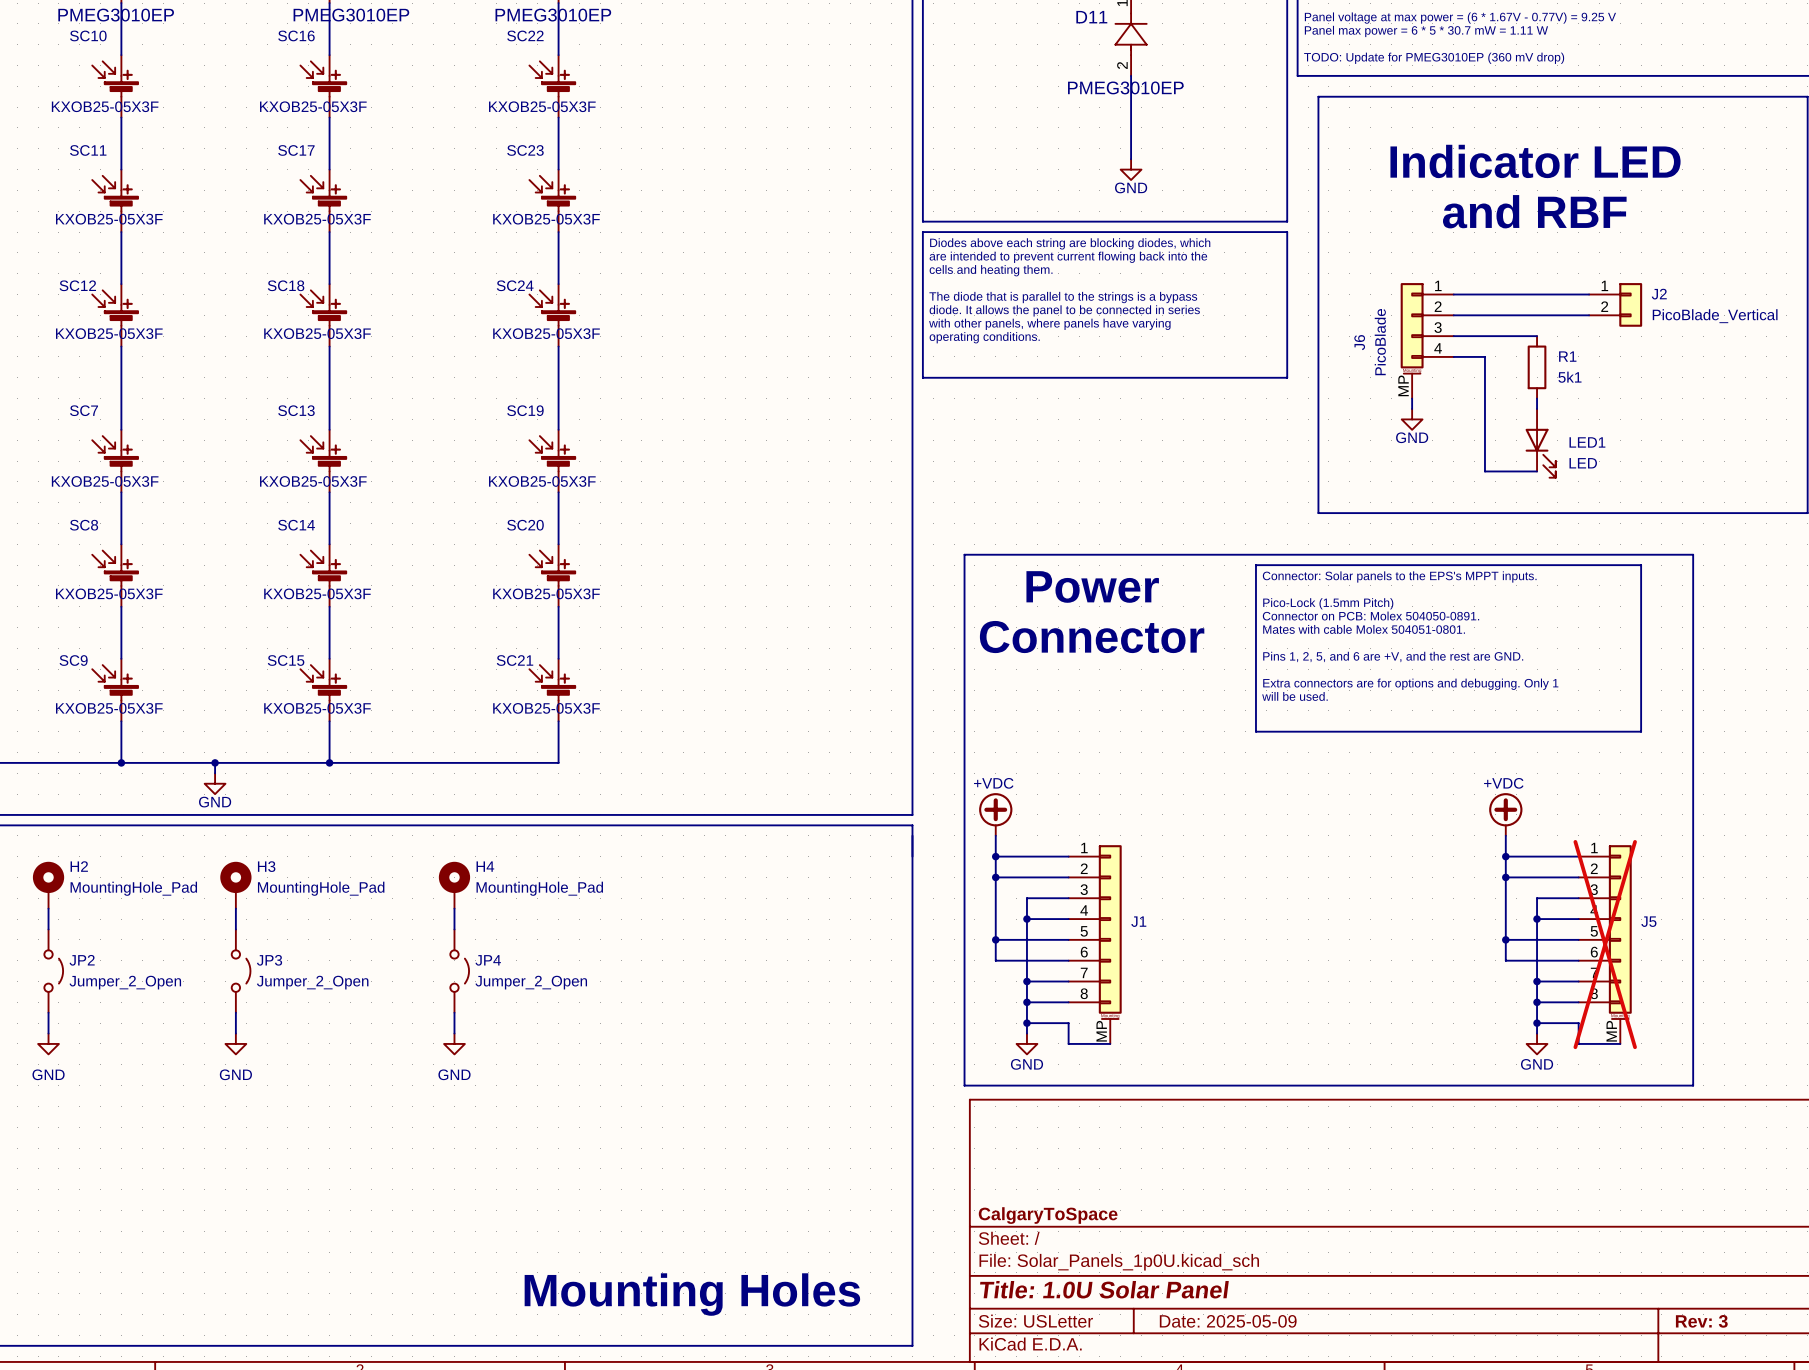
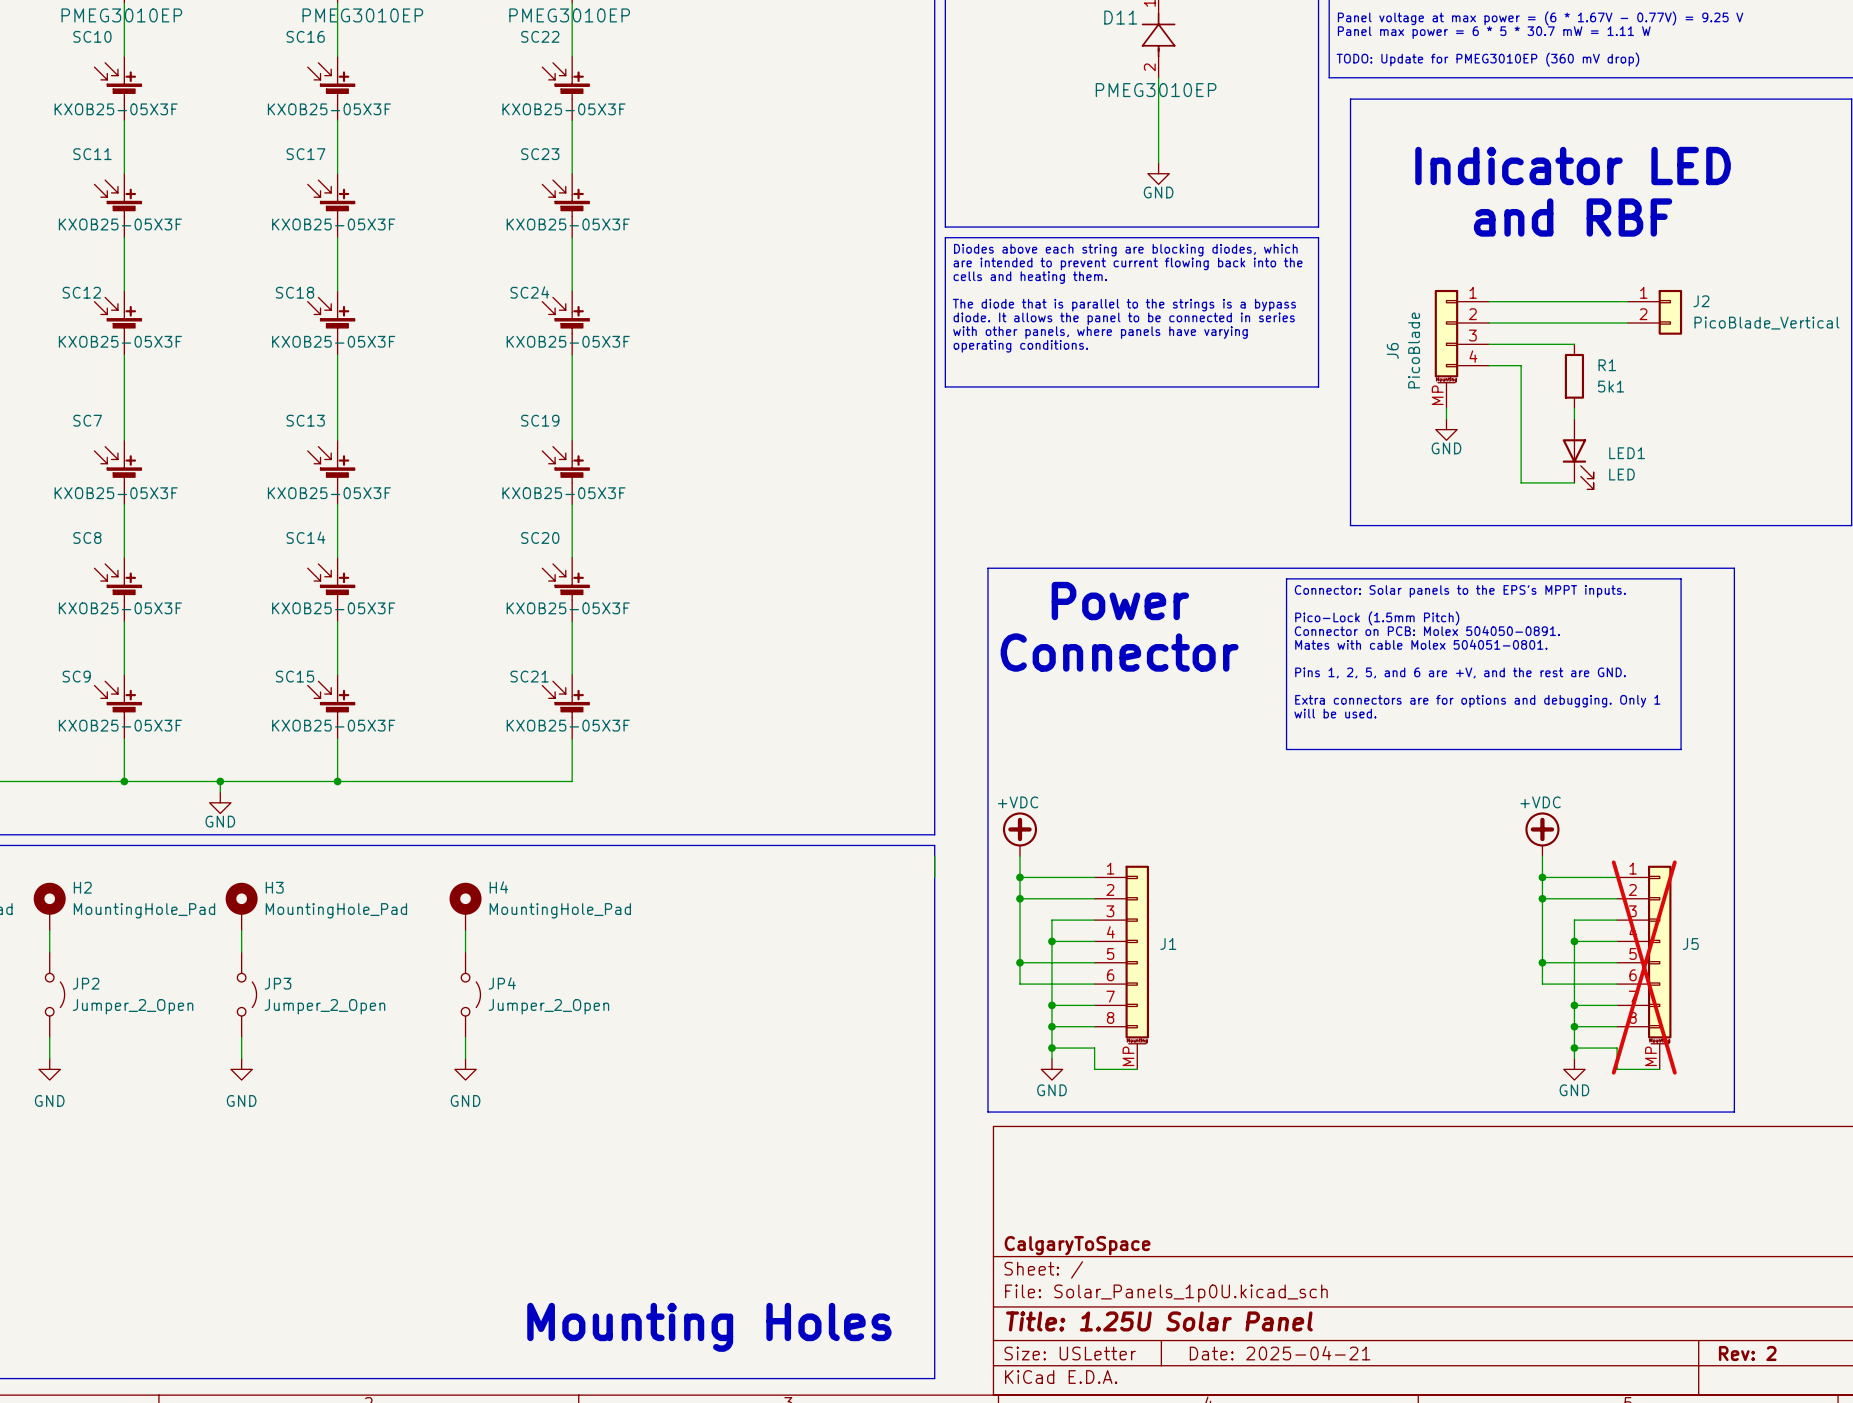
title block: Title: 1.0U Solar Panel (1104, 1289) -> Title: 1.25U Solar Panel (1159, 1321)
title block: Date: 2025-05-09 (1228, 1321) -> Date: 2025-04-21 (1280, 1353)
title block: Rev: 3 (1701, 1321) -> Rev: 2 (1747, 1353)

